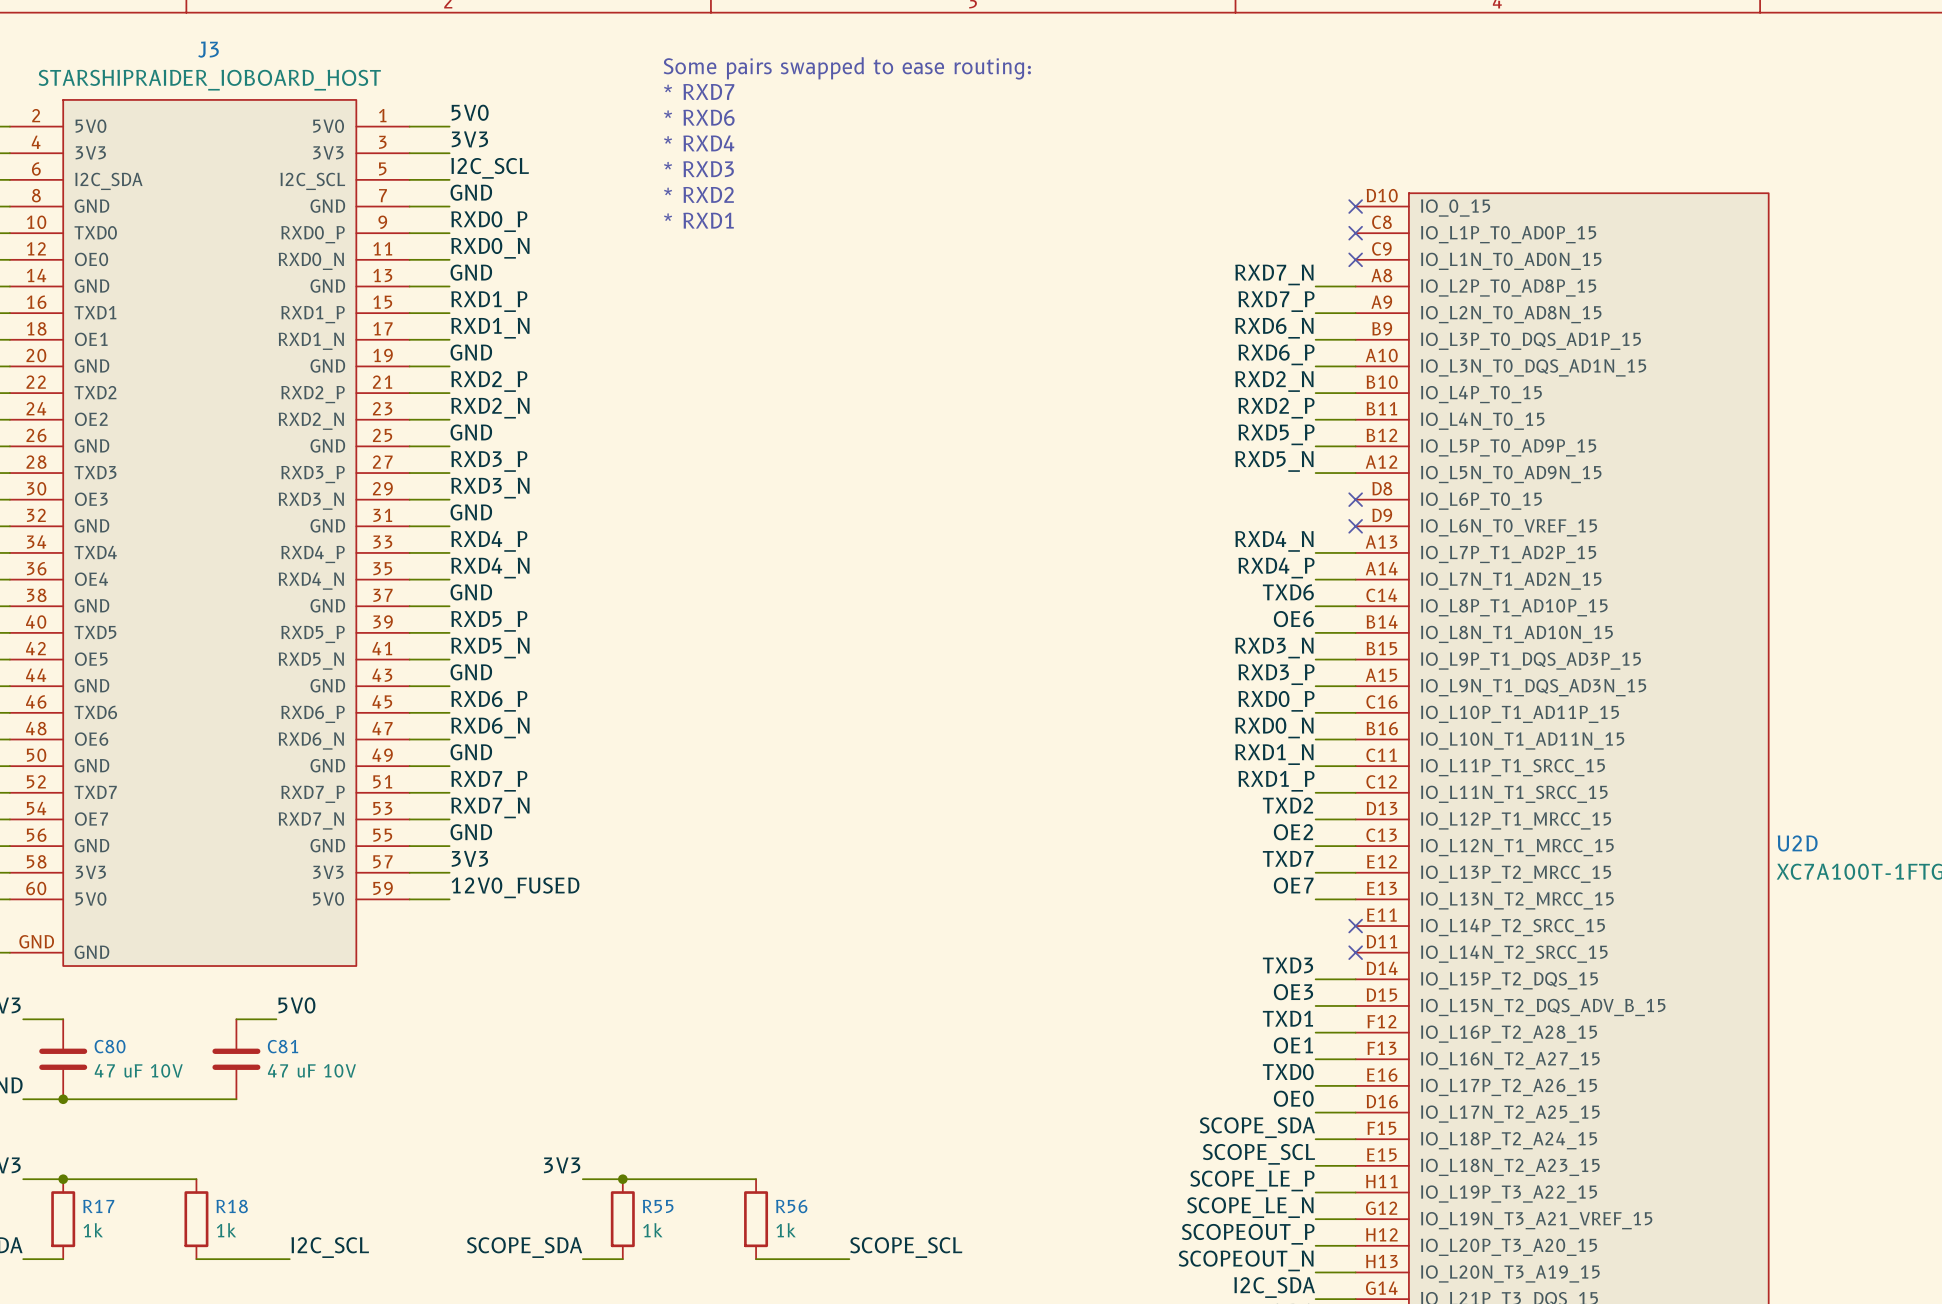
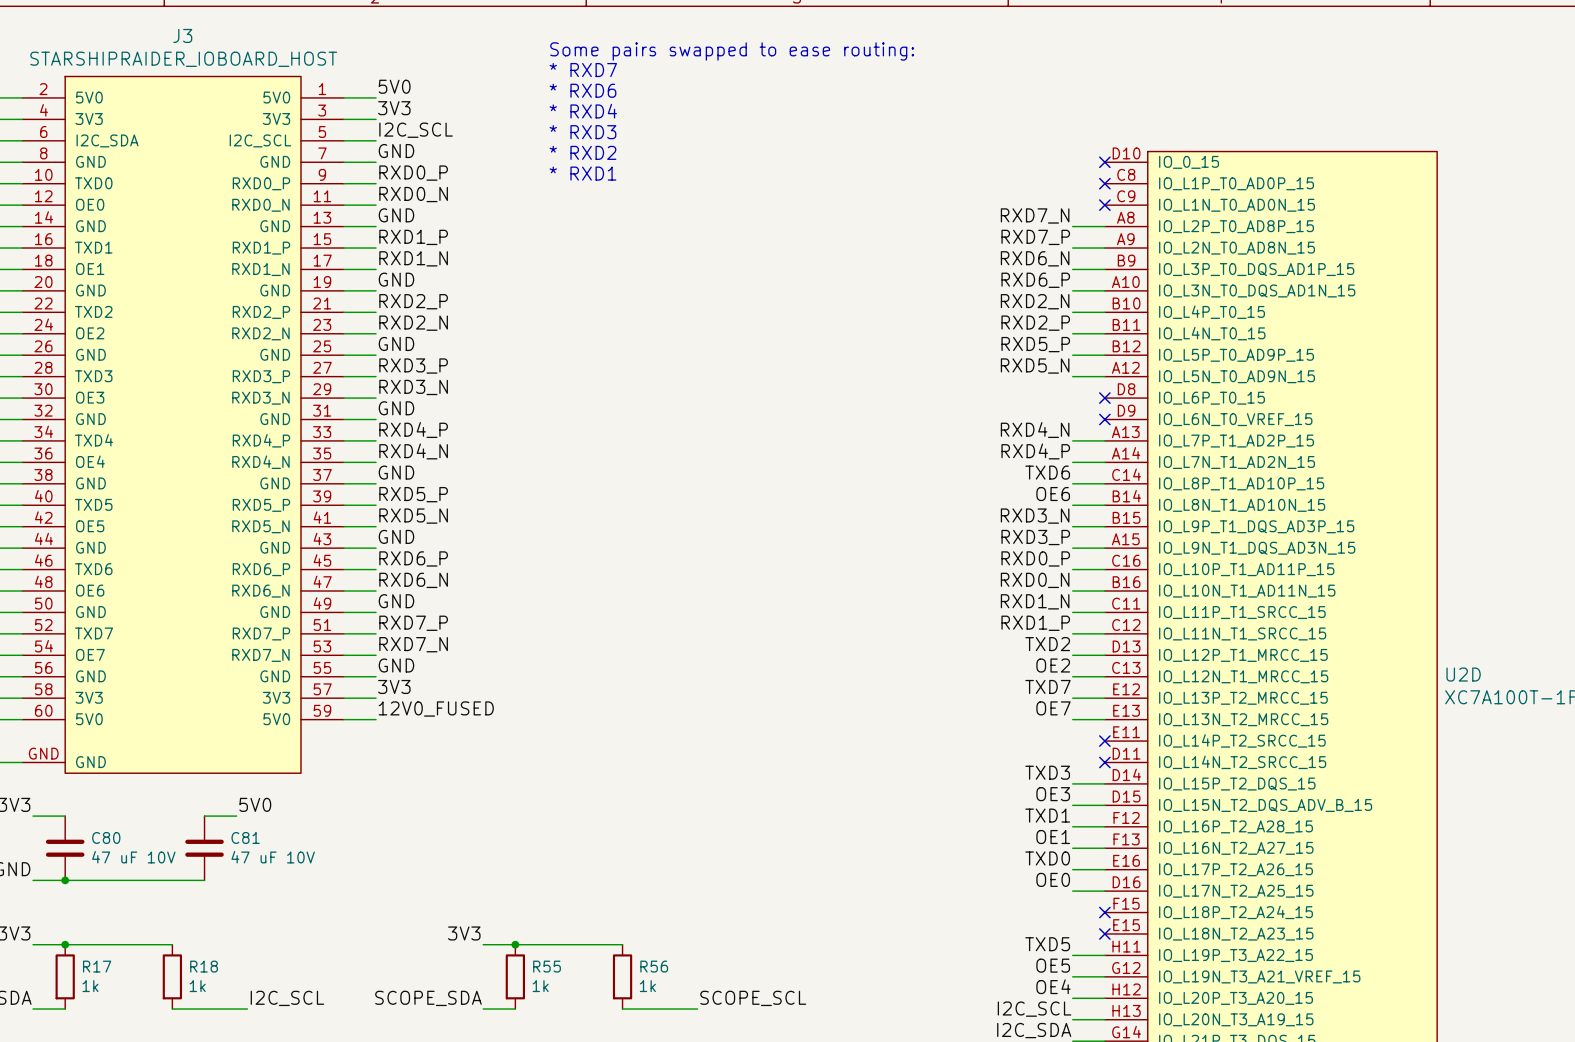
label: SCOPE_SDA (1257, 1127) -> none
wire: (1315, 1139) (1355, 1139) -> none
no-connect mark: none -> (1104, 912)
label: SCOPE_SCL (1258, 1154) -> none
wire: (1315, 1165) (1355, 1165) -> none
no-connect mark: none -> (1104, 933)
label: SCOPE_LE_P (1252, 1180) -> TXD5 (1047, 944)
label: SCOPE_LE_N (1250, 1207) -> OE5 (1053, 965)
label: SCOPEOUT_P (1248, 1234) -> OE4 (1053, 986)
label: SCOPEOUT_N (1246, 1260) -> I2C_SCL (1034, 1009)

